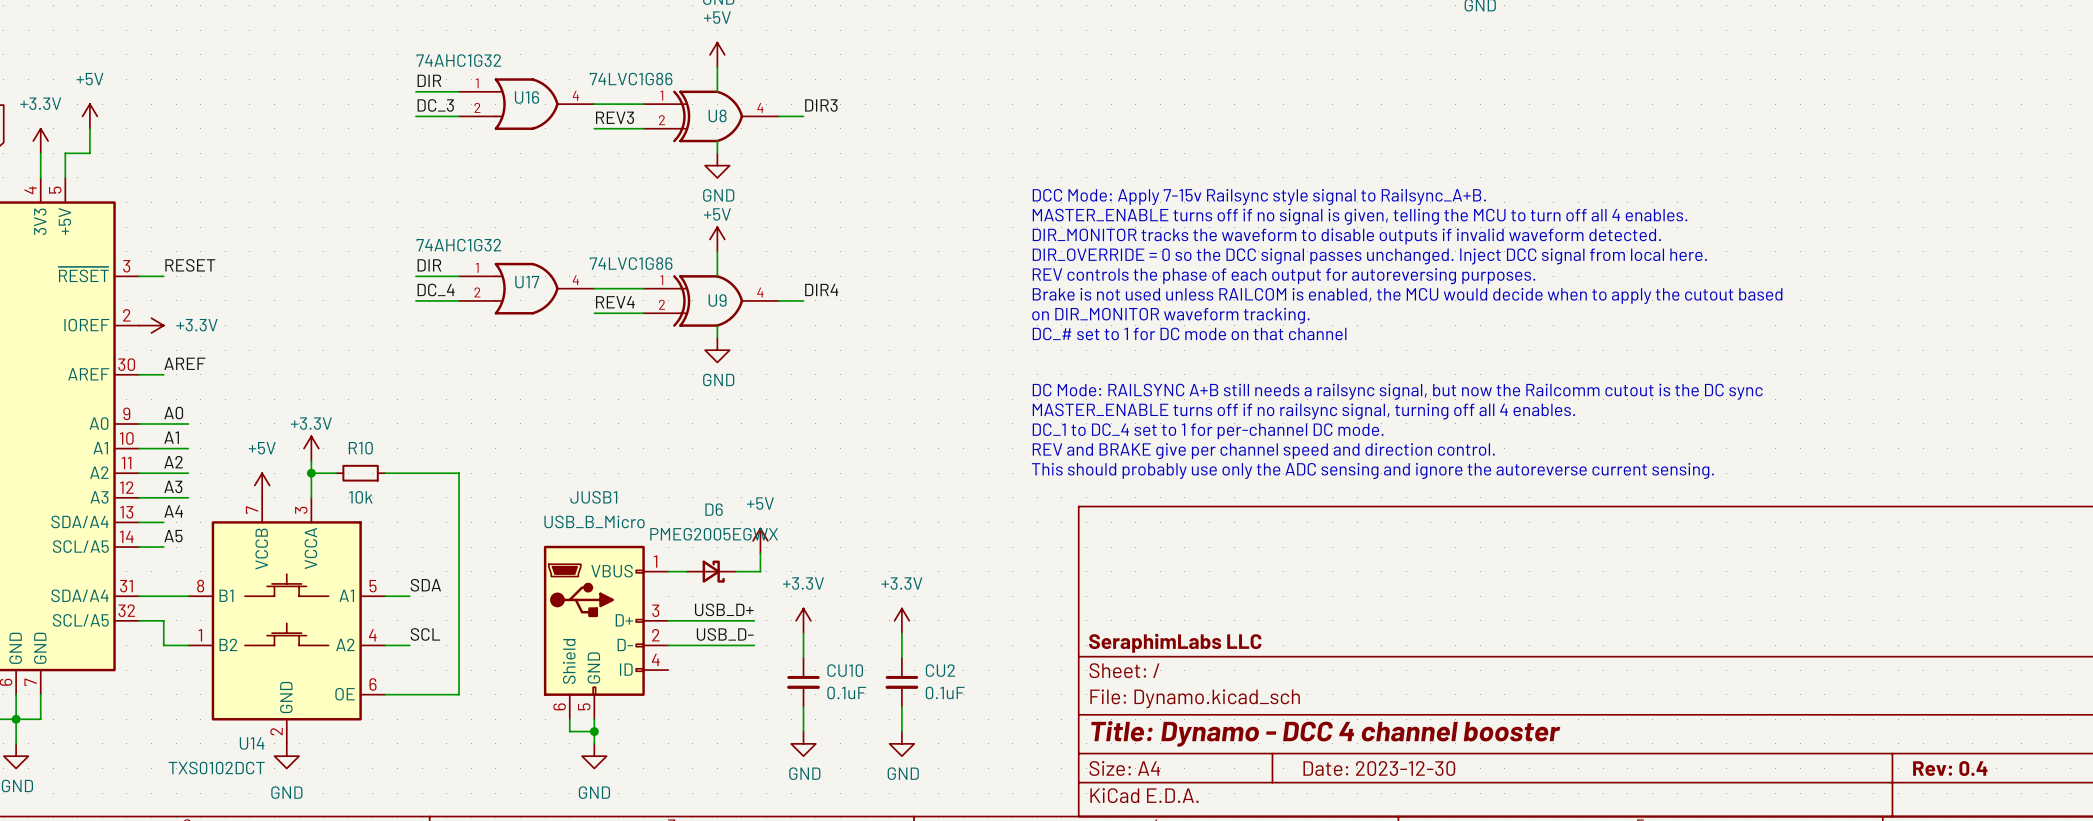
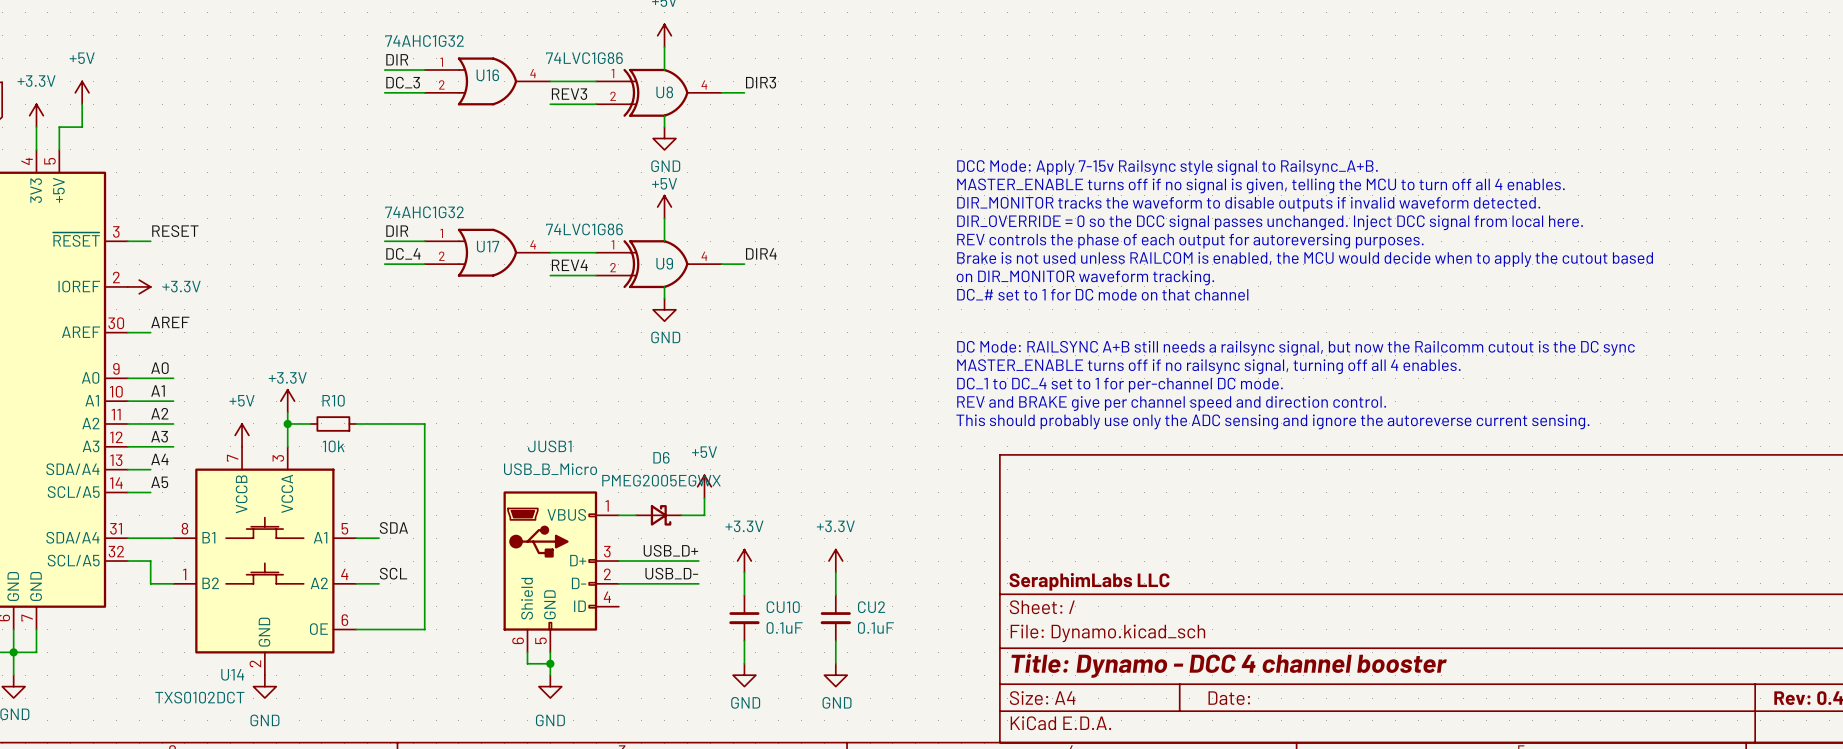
title block: Date: 2023-12-30 (1379, 768) -> Date: (1229, 698)

